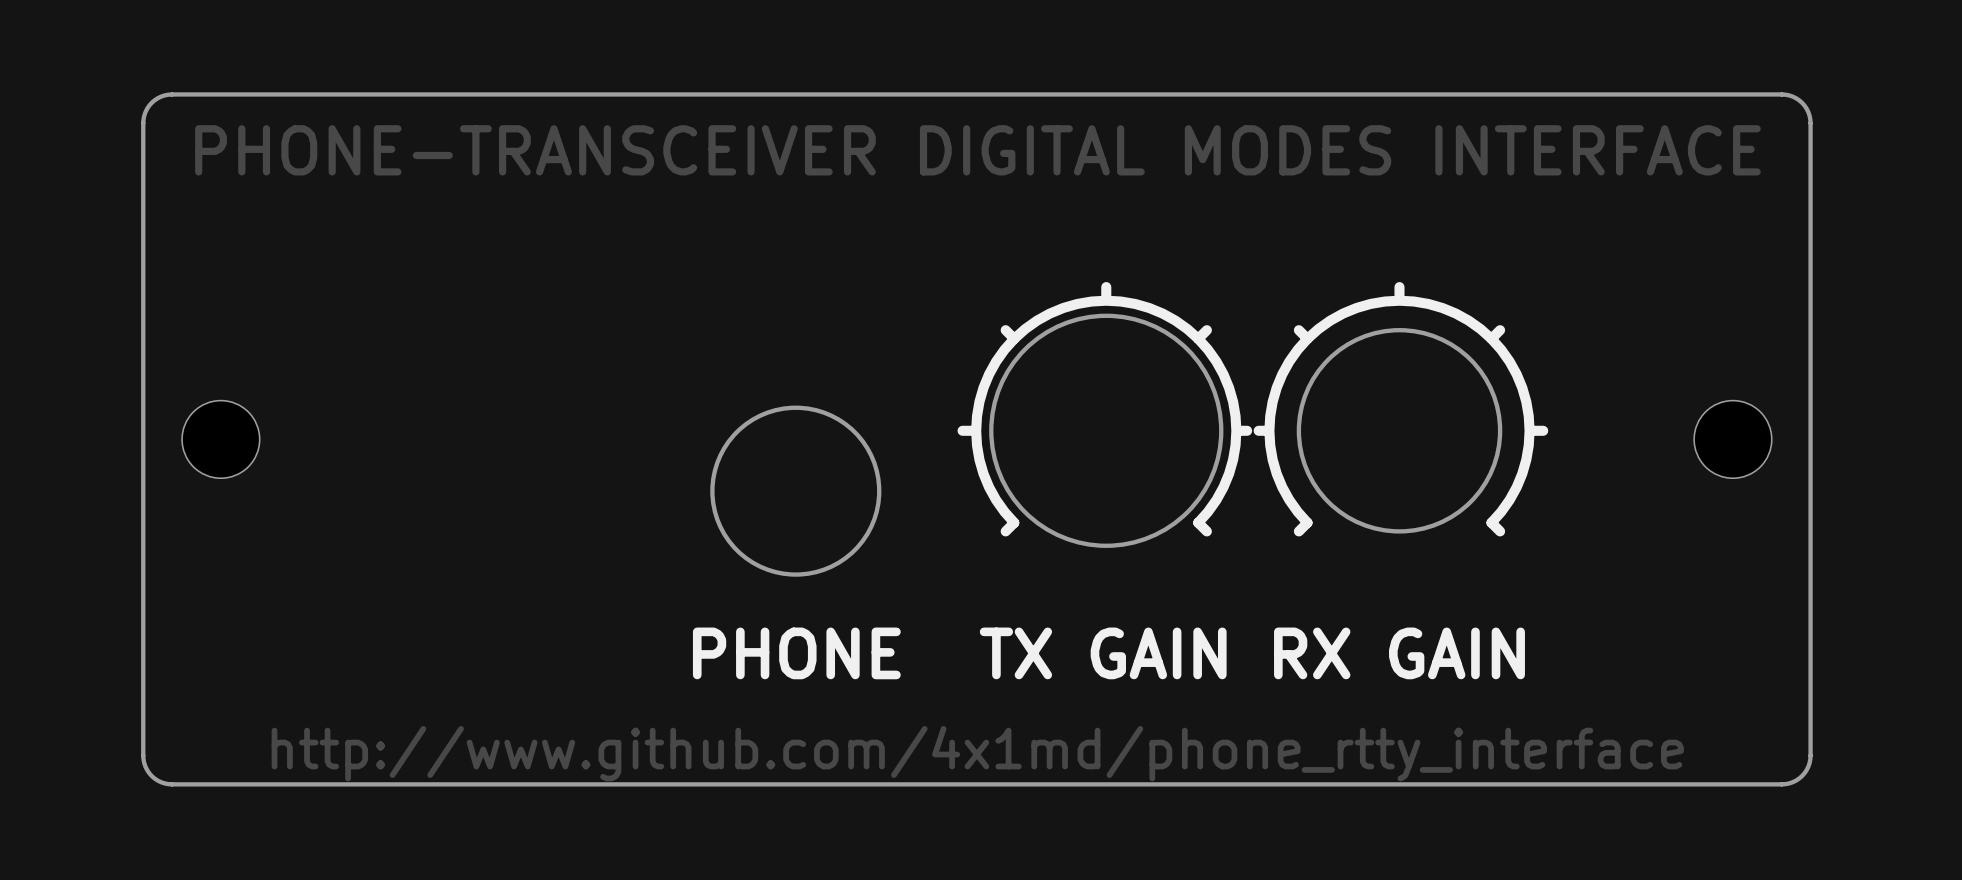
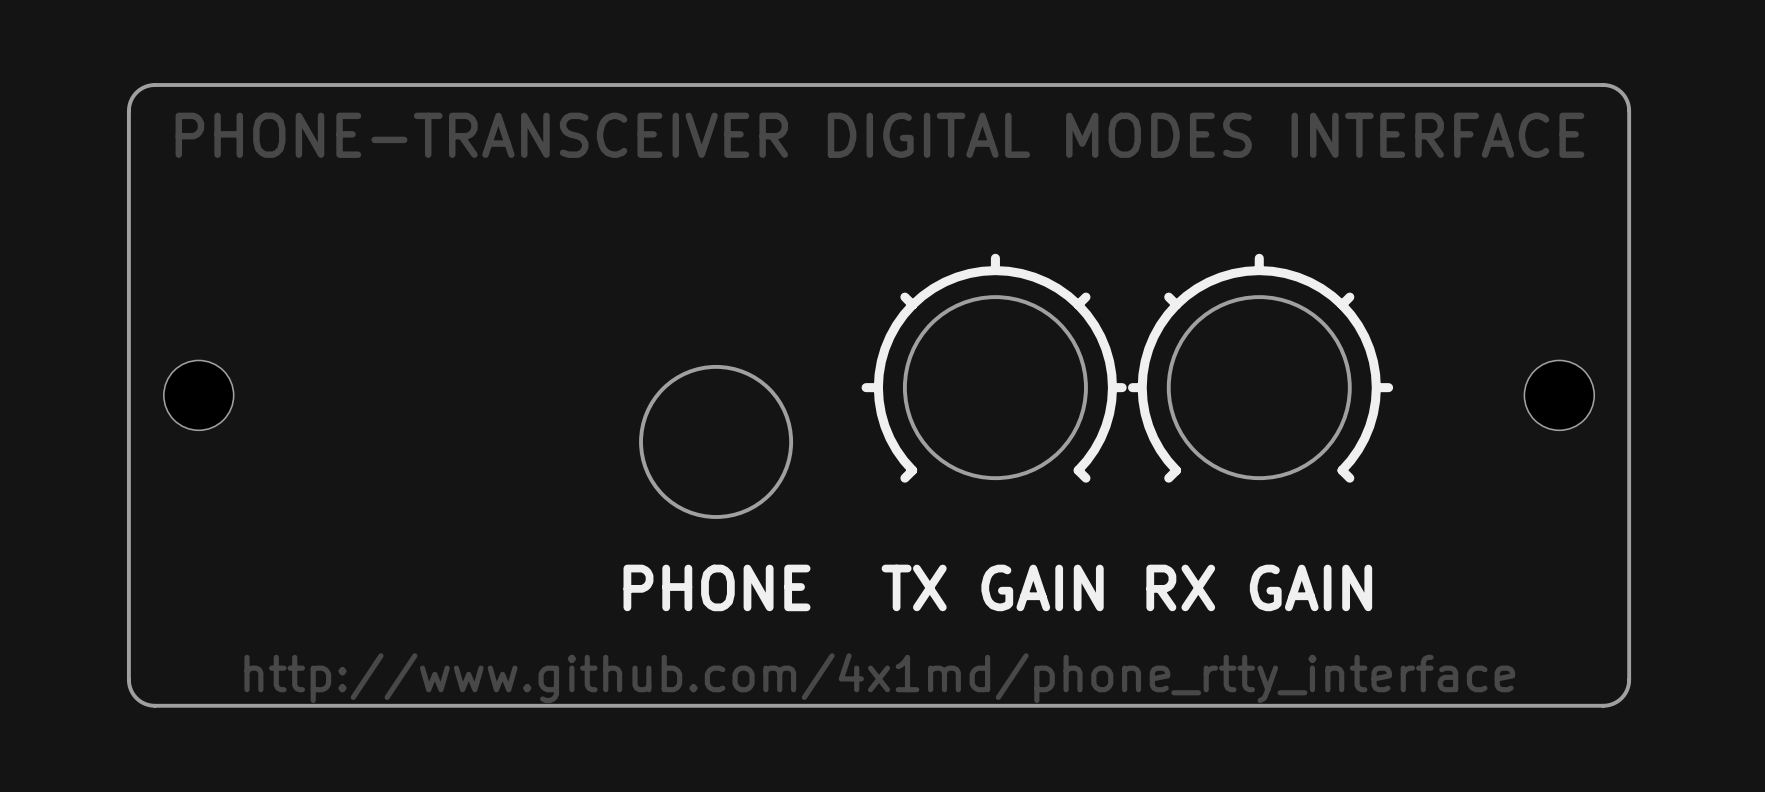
round board edge size: [989, 313, 1224, 548] -> [902, 295, 1088, 481]

